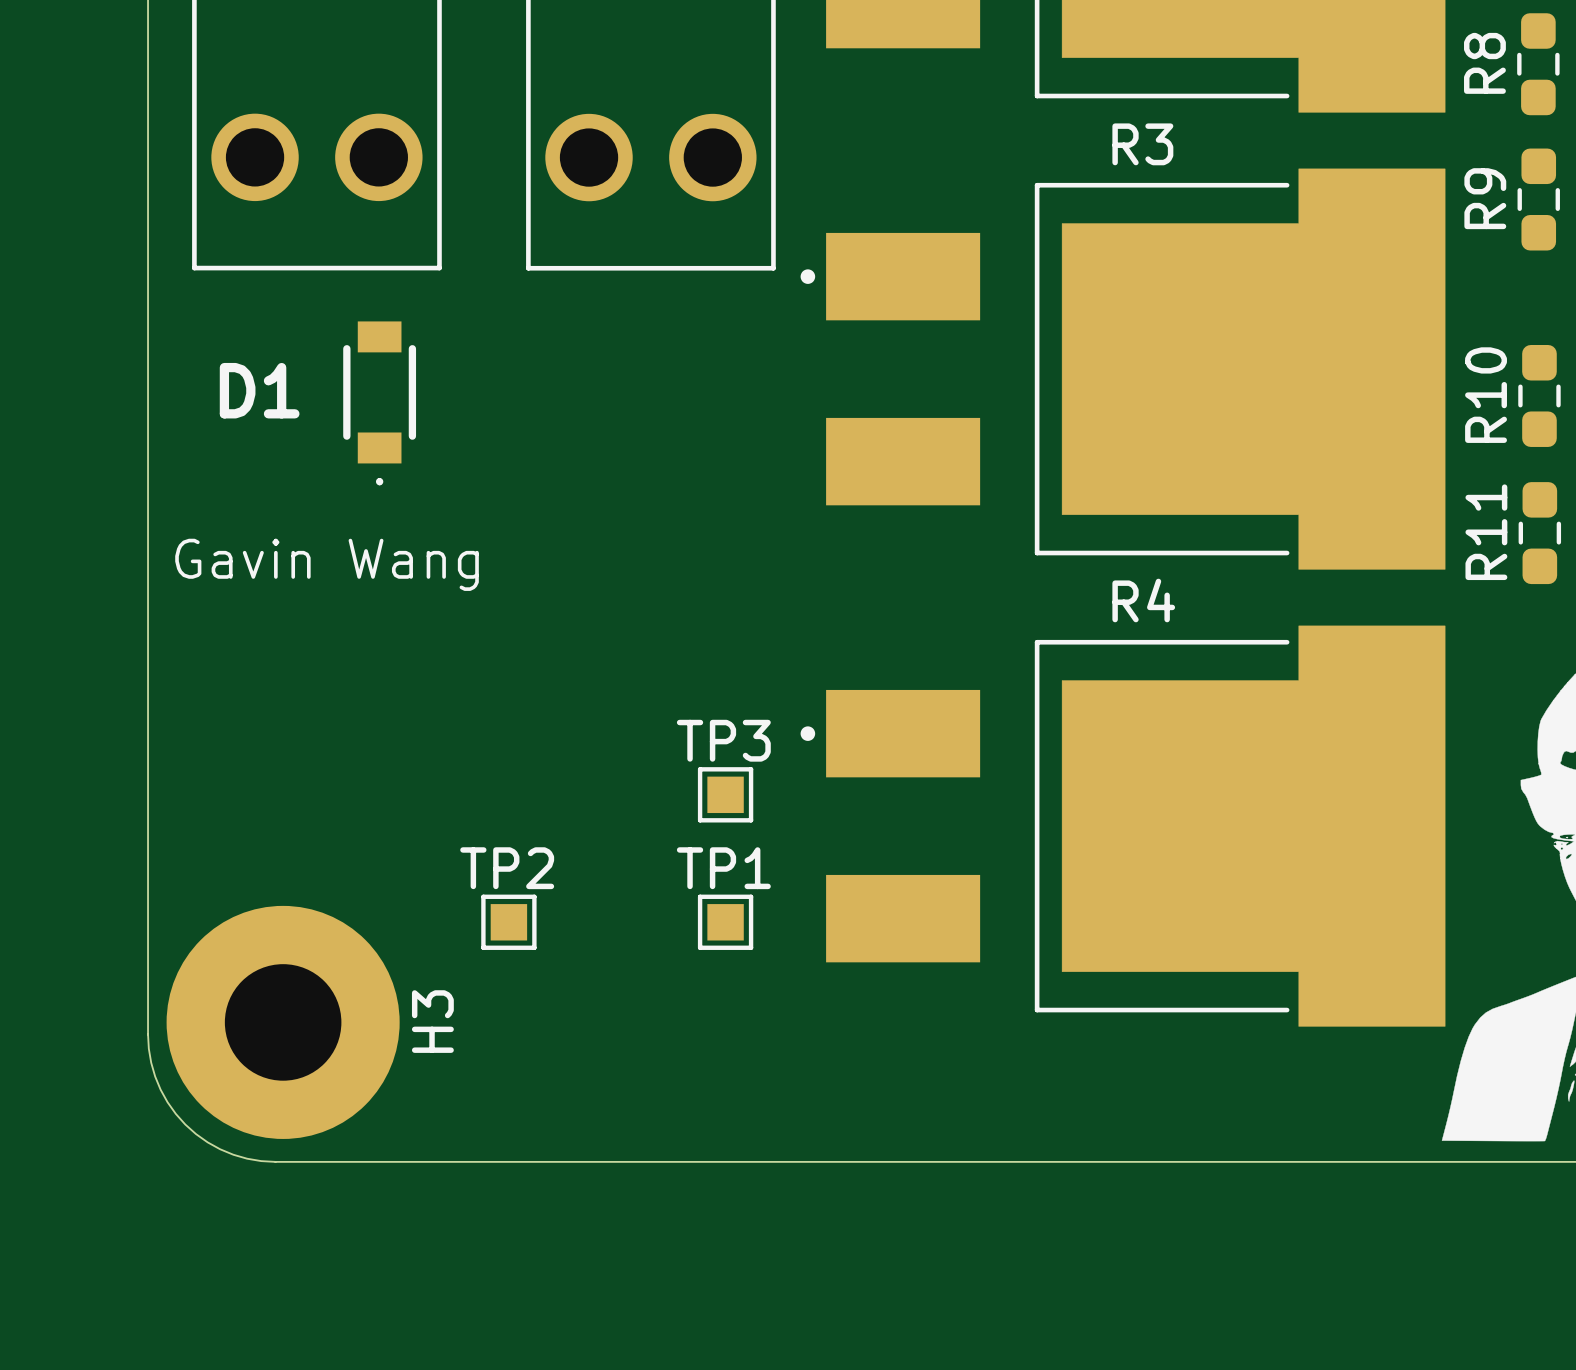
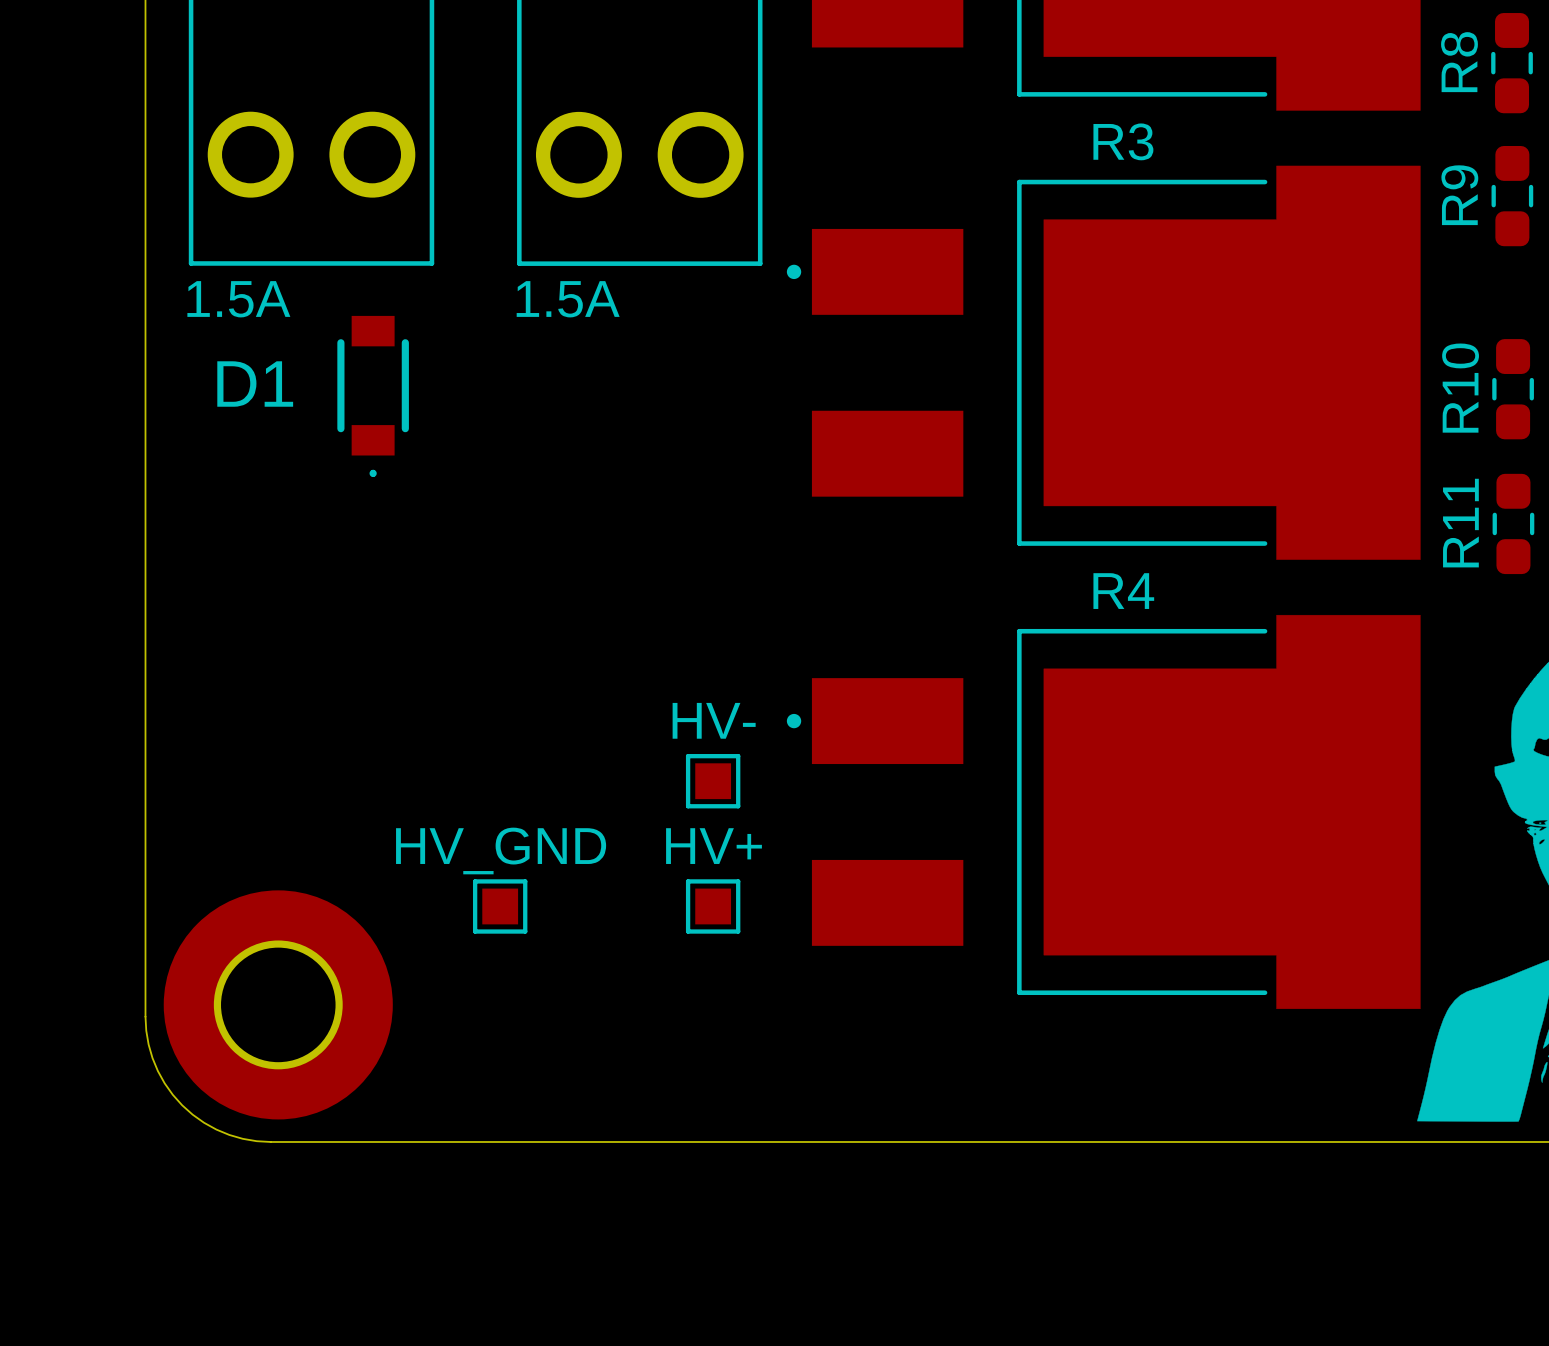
text: none -> 1.5A (238, 299)
text: none -> 1.5A (568, 299)
text: Gavin Wang (327, 564) -> none
TP3 name: TP3 (723, 740) -> HV- (714, 720)
TP2 name: TP2 (507, 868) -> HV_GND (501, 850)
TP1 name: TP1 (723, 868) -> HV+ (714, 846)
H3 name: H3 (432, 1021) -> none

